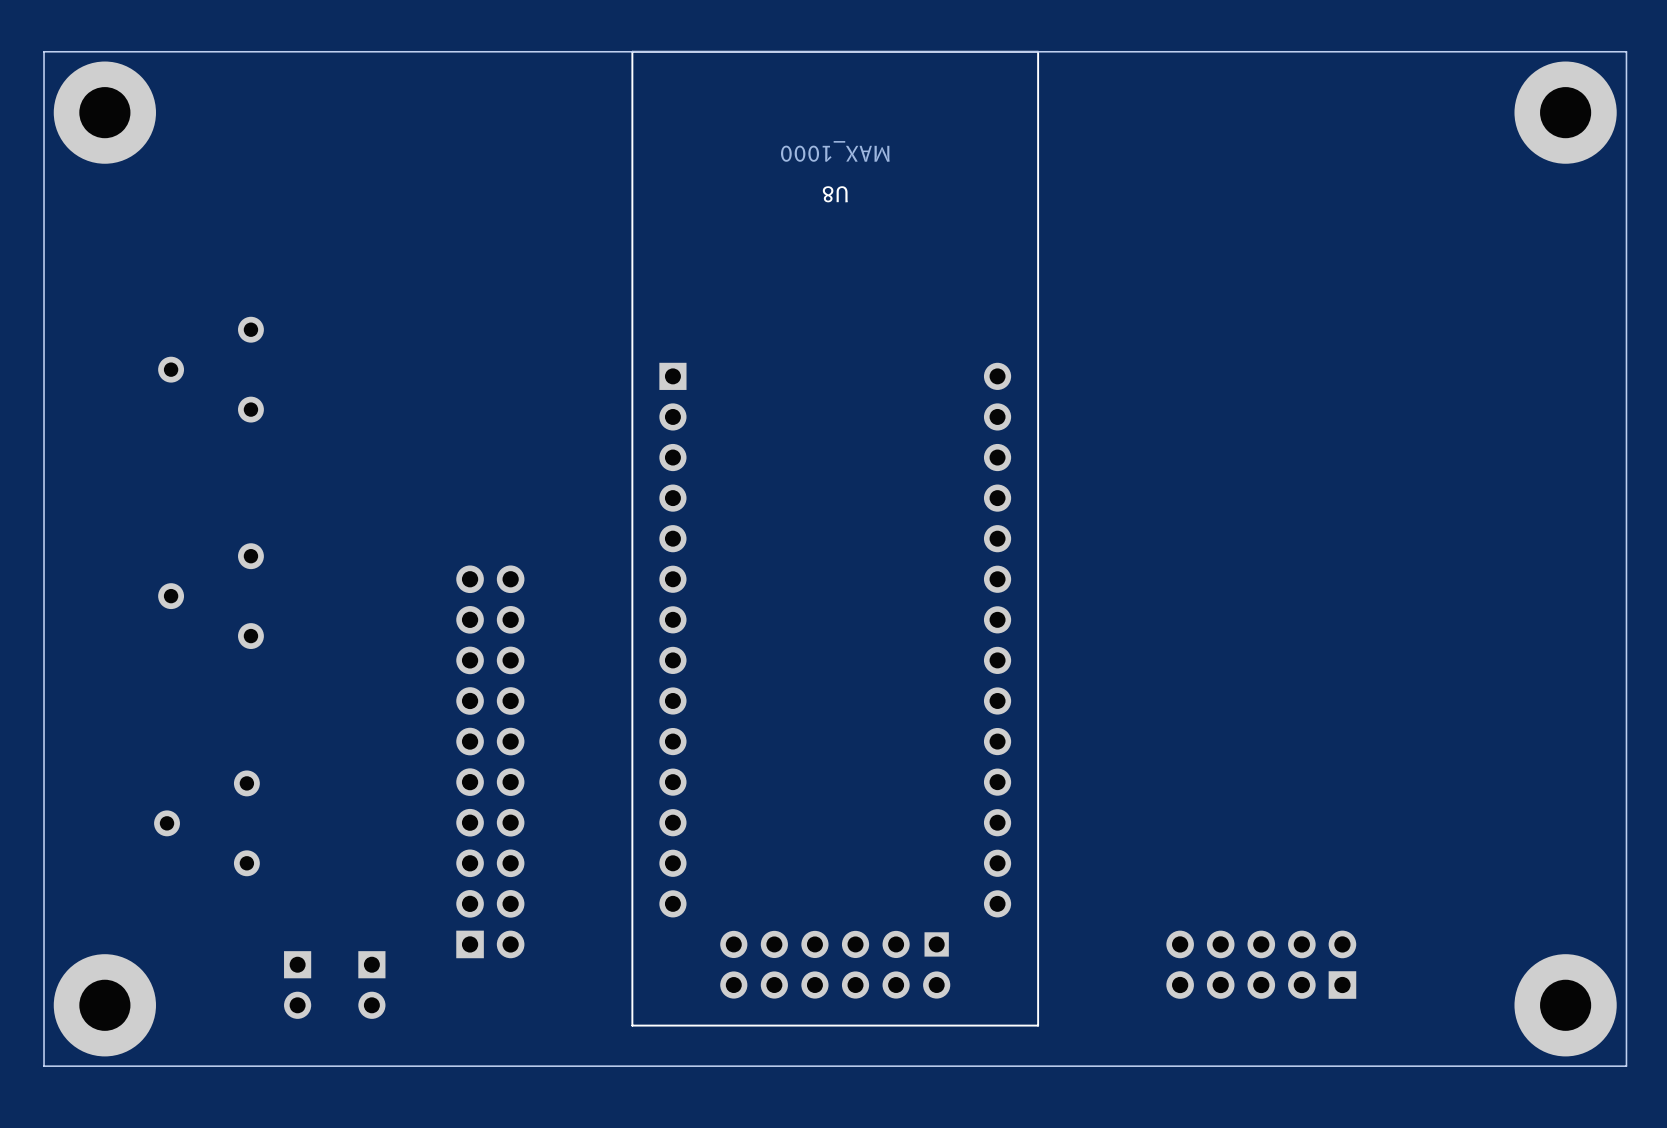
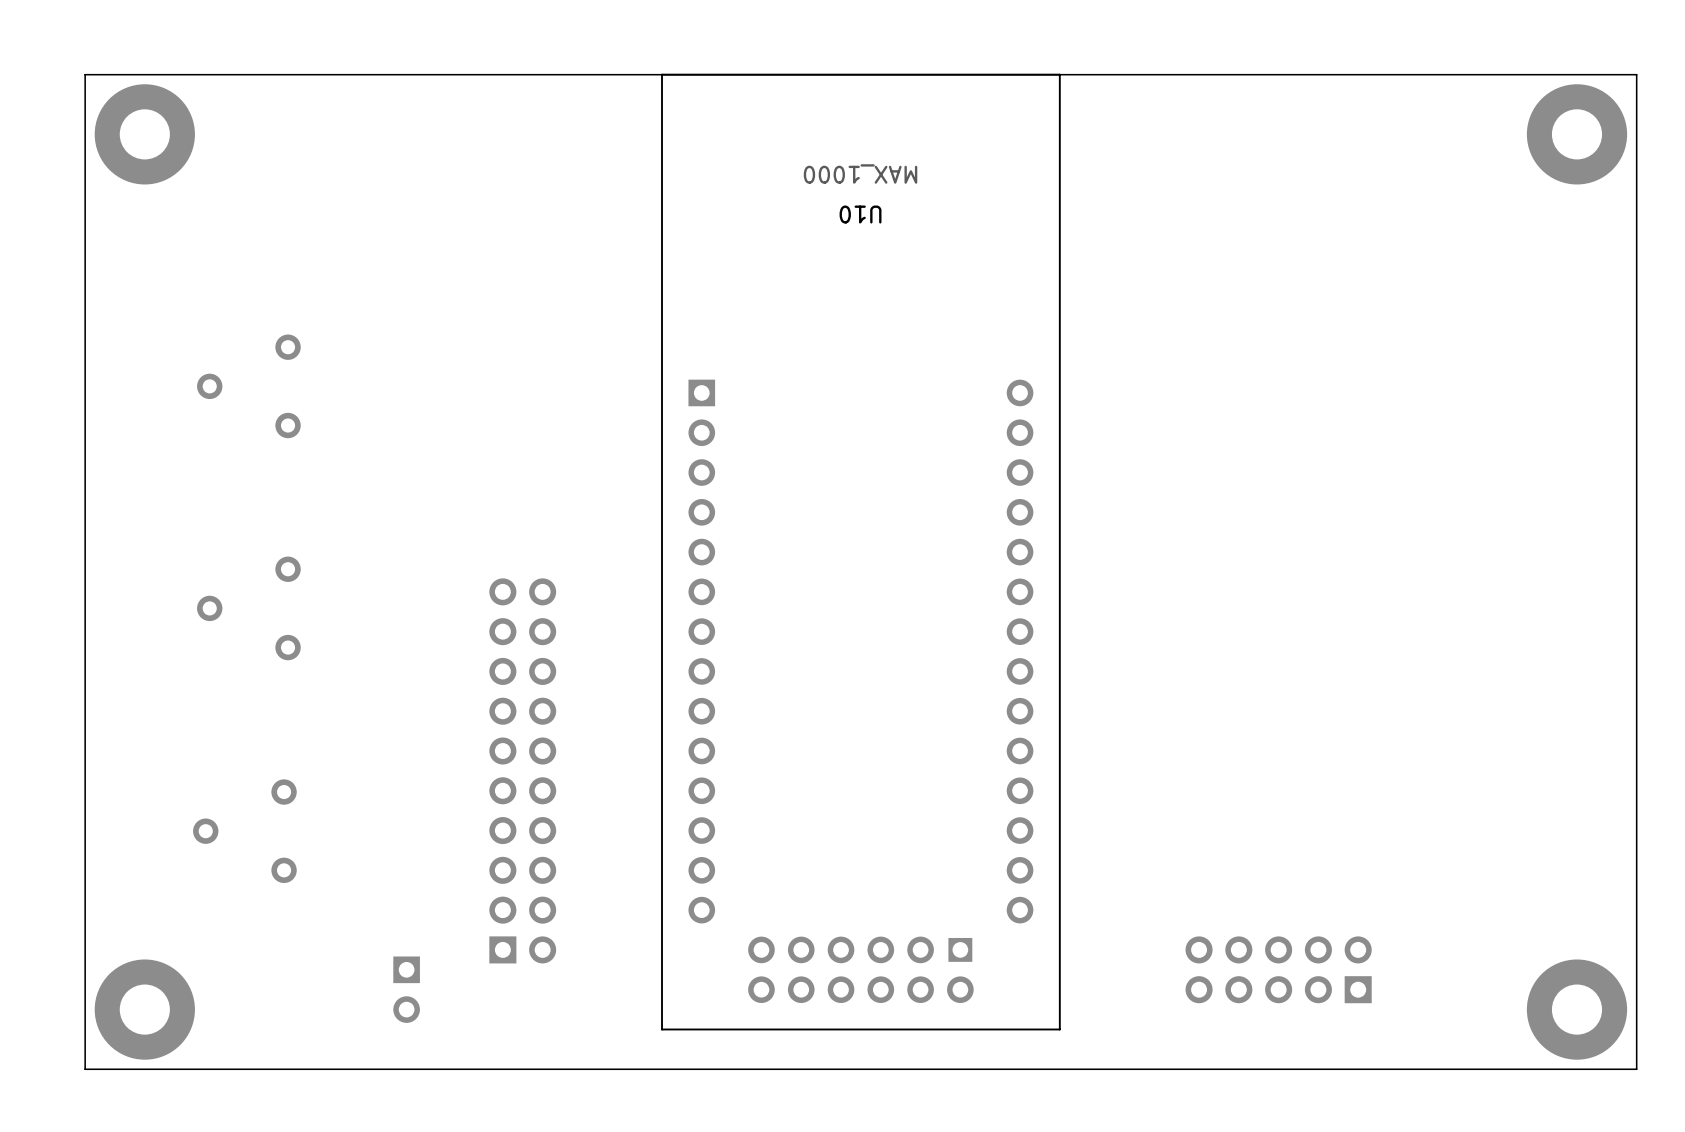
U8 name: U8 (835, 194) -> U10 (860, 214)
part: (297, 985) -> none

